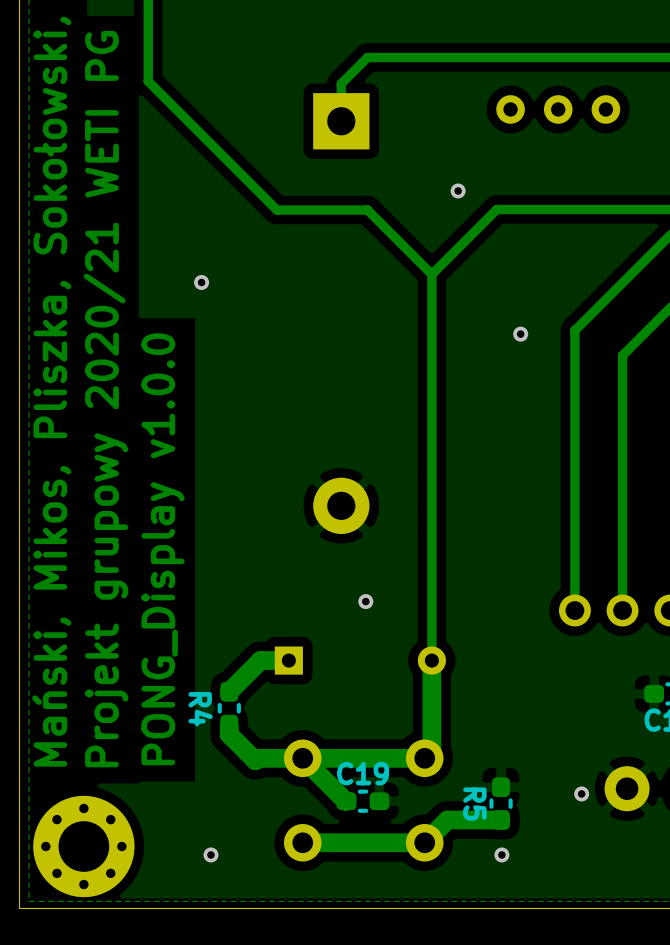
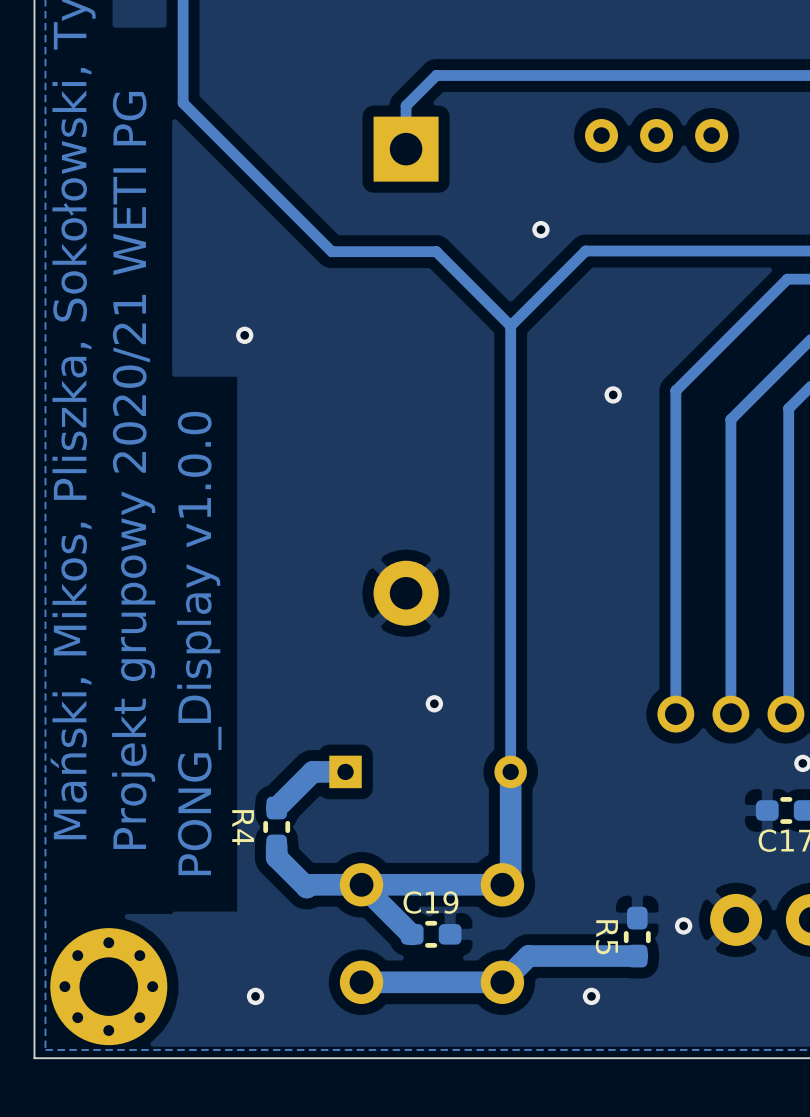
R5 position: (501, 803) -> (637, 937)
track: none -> (637, 956) (590, 956)

